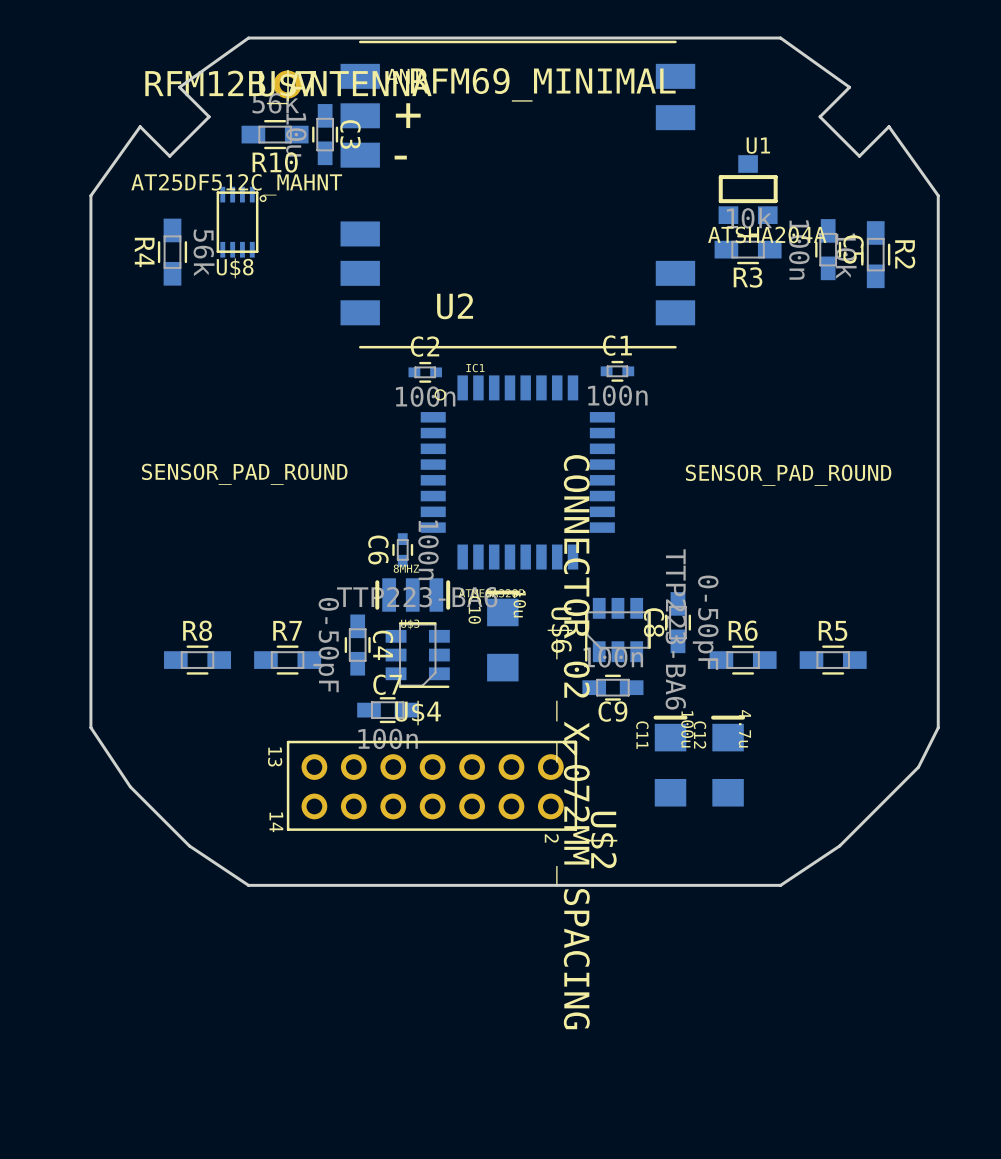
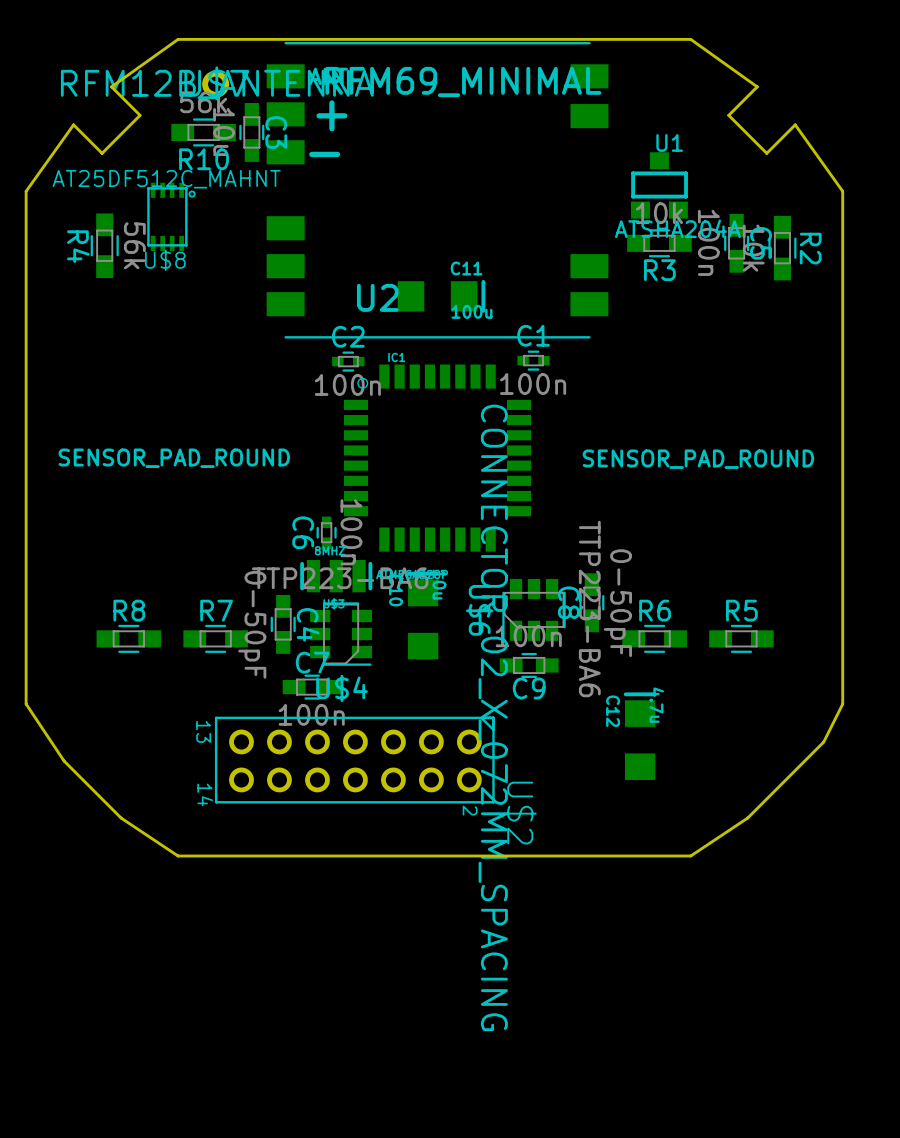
C11 rotation: 0° (670, 761) -> 90° clockwise (441, 296)
C11 position: (670, 761) -> (441, 296)

